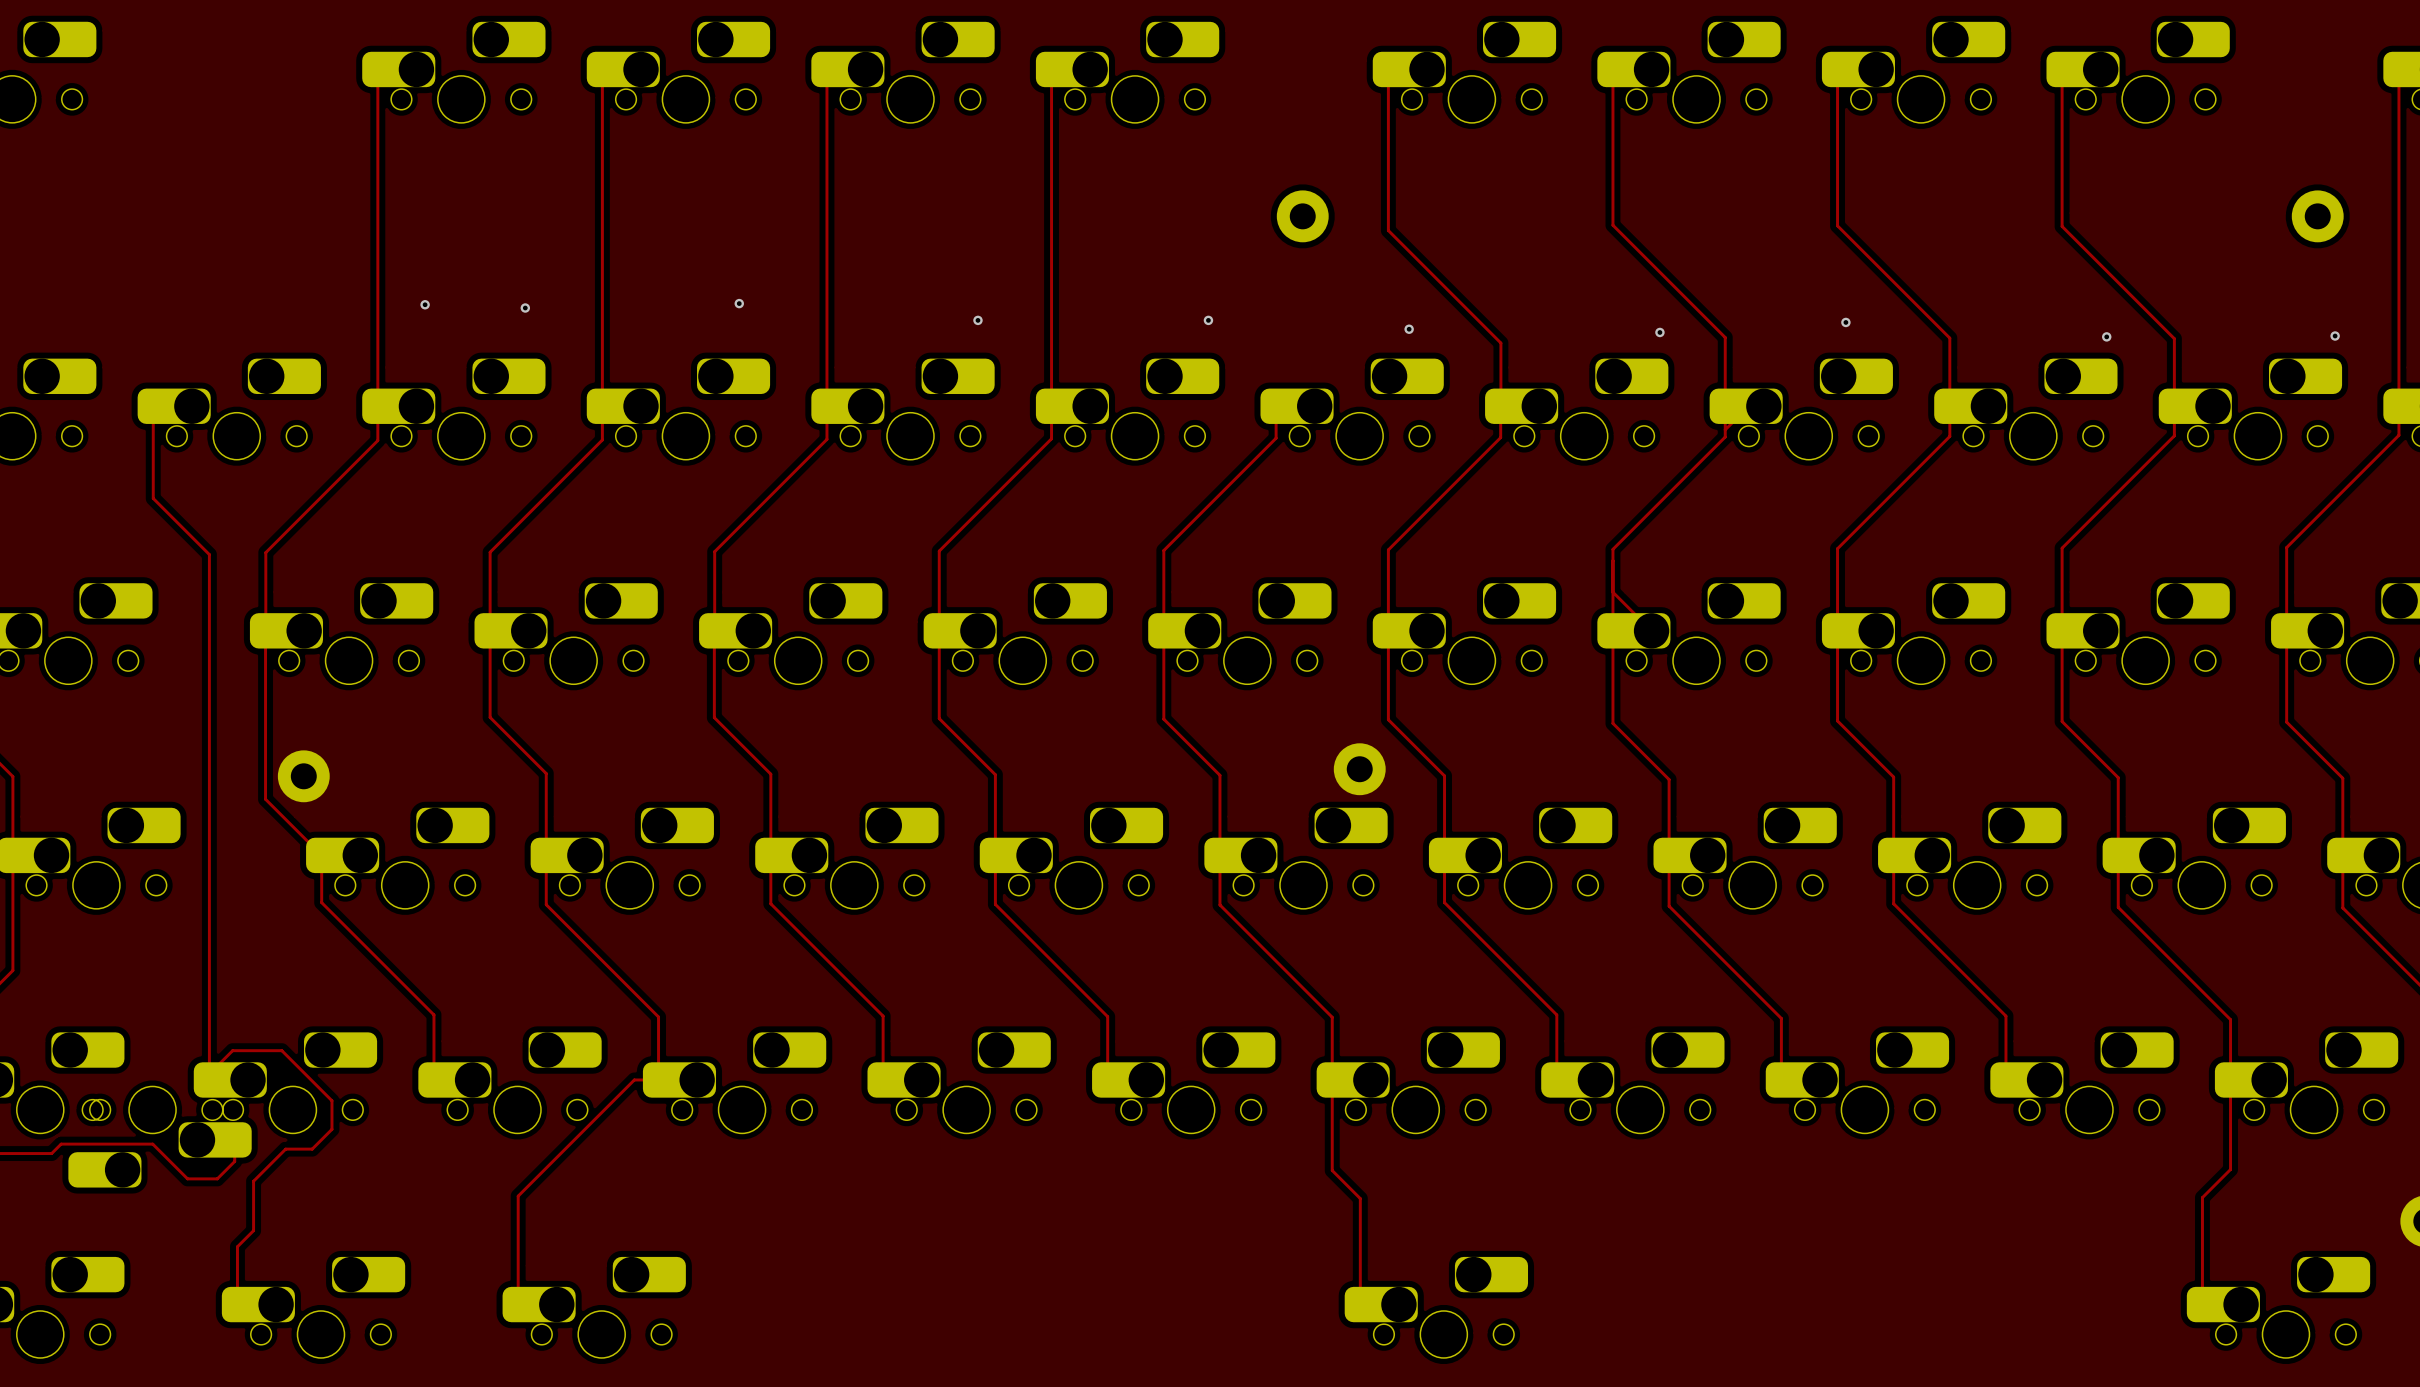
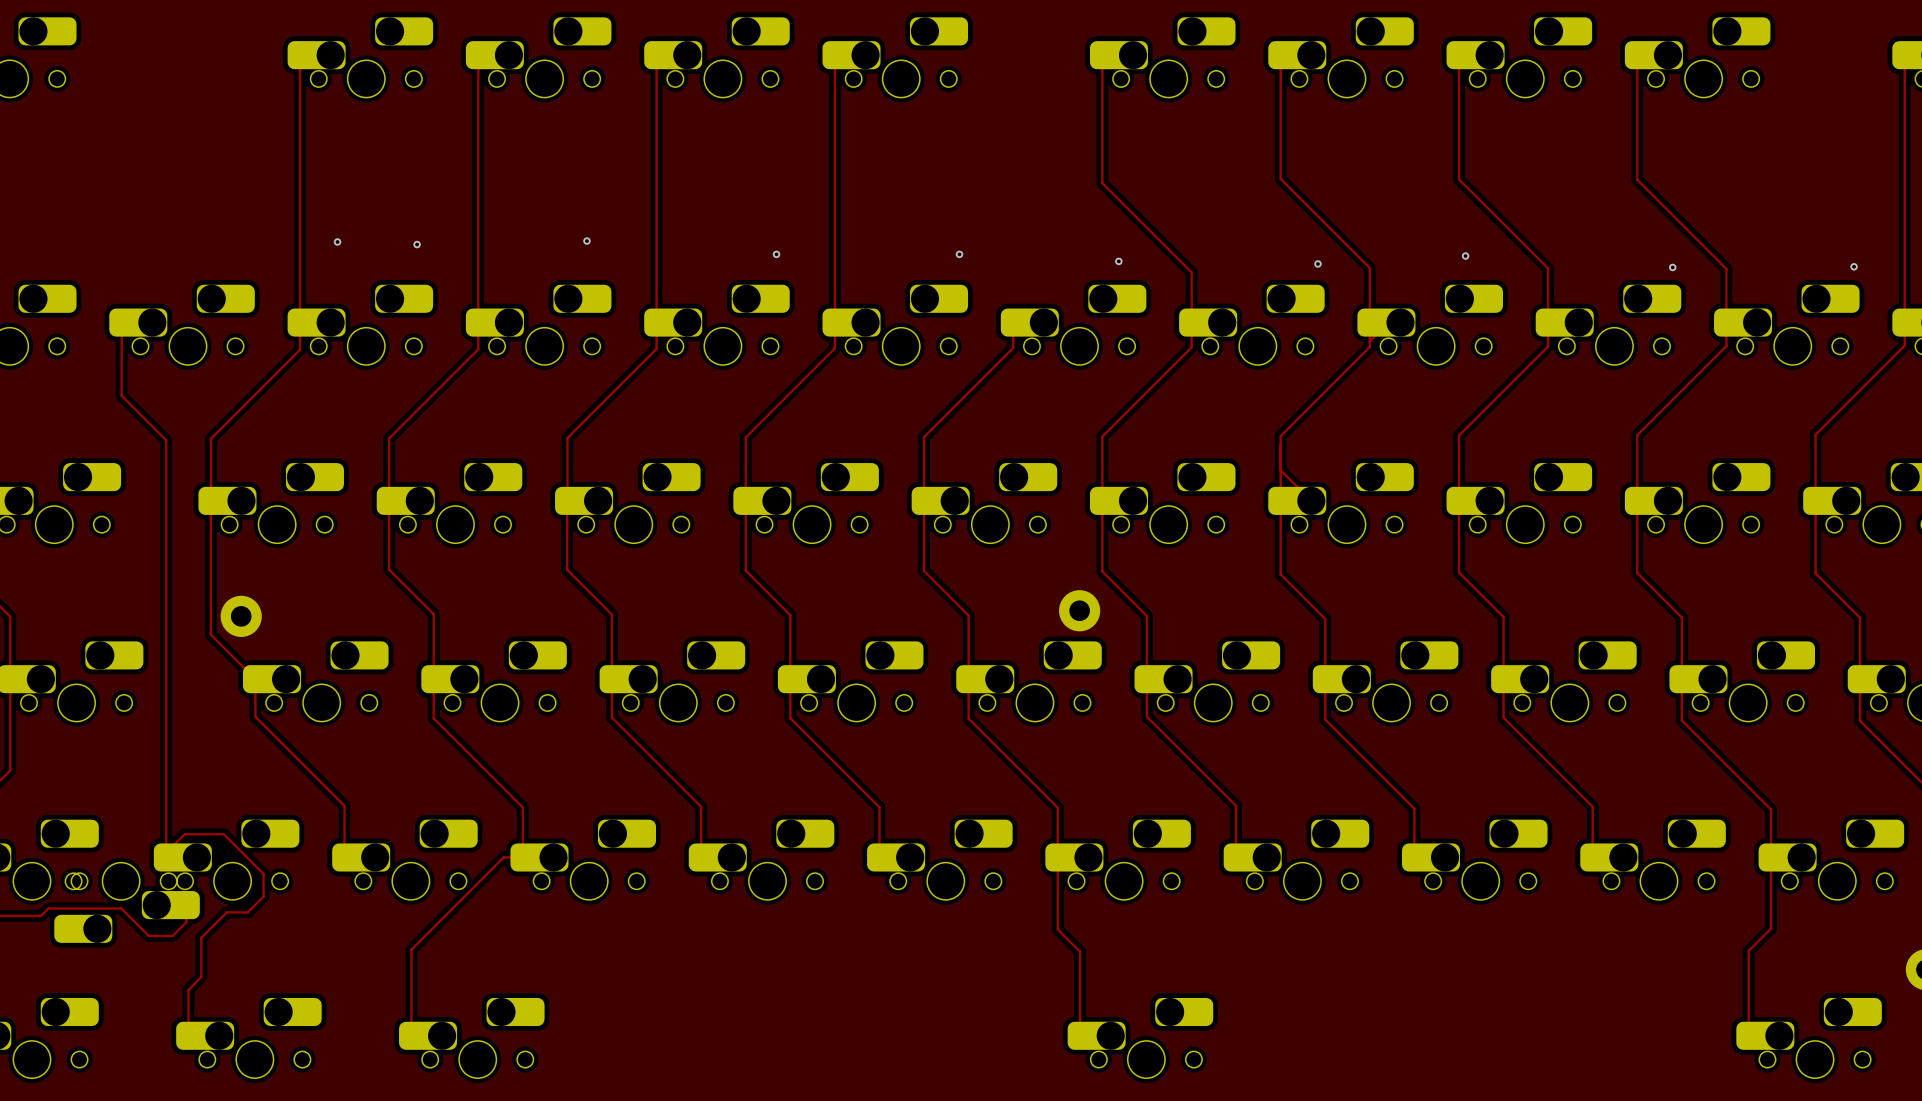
part: (1302, 216) -> none
part: (2317, 216) -> none

